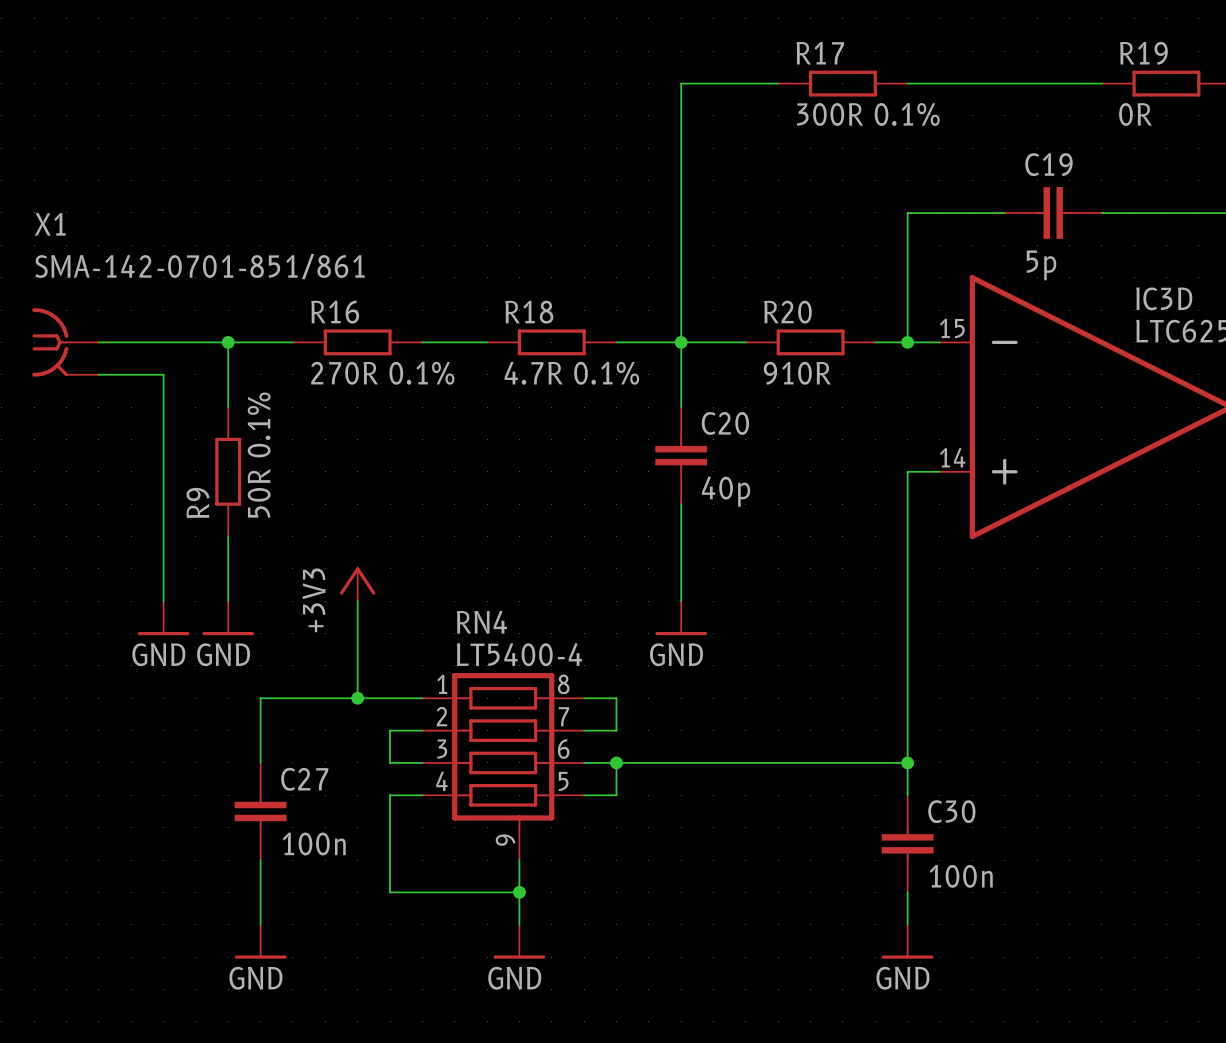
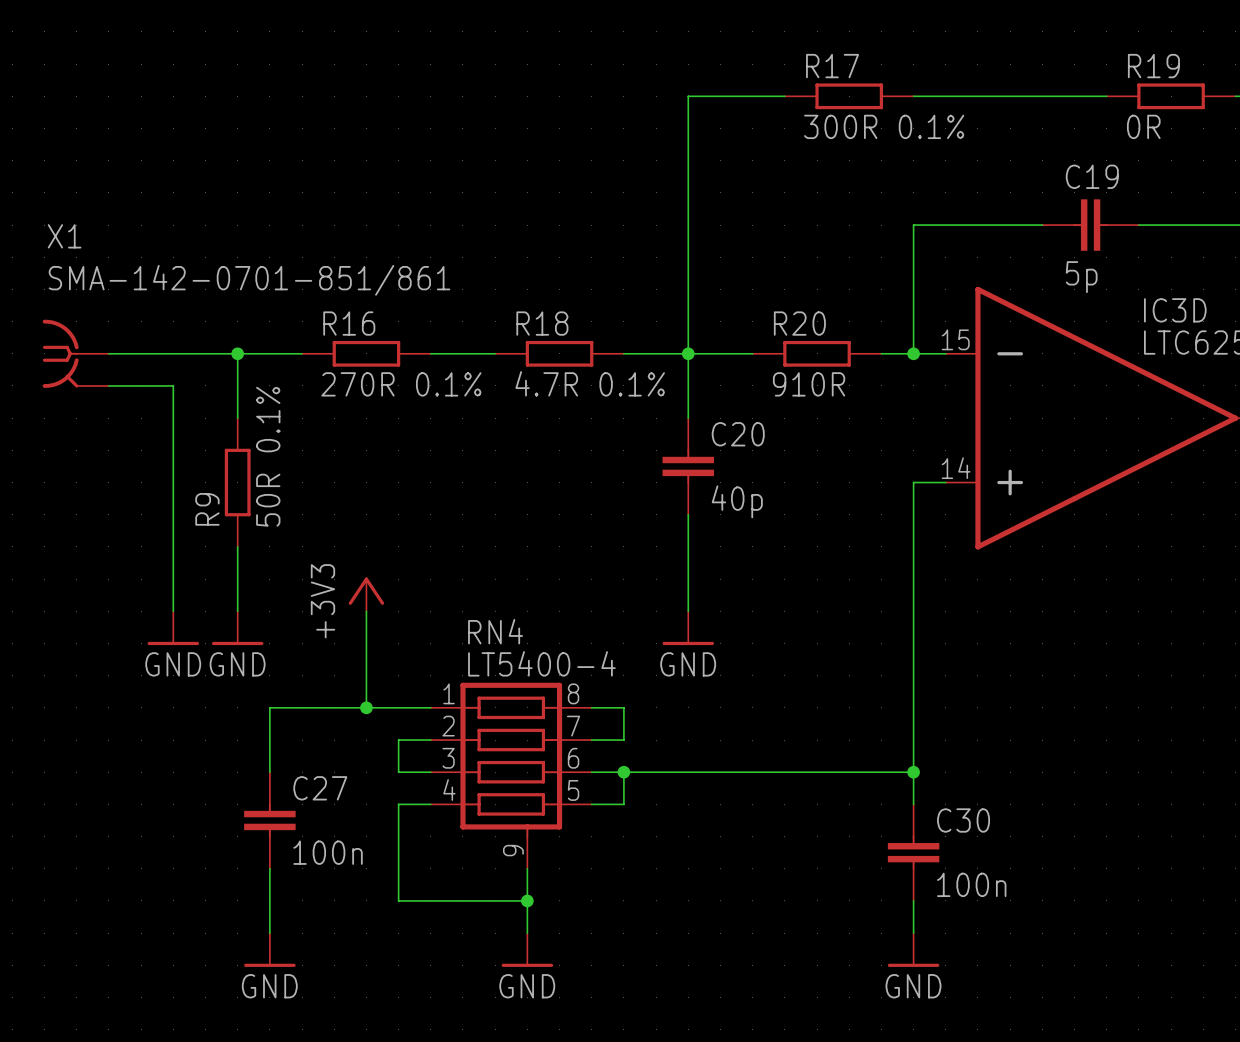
C19 position: (1053, 212) -> (1090, 225)

